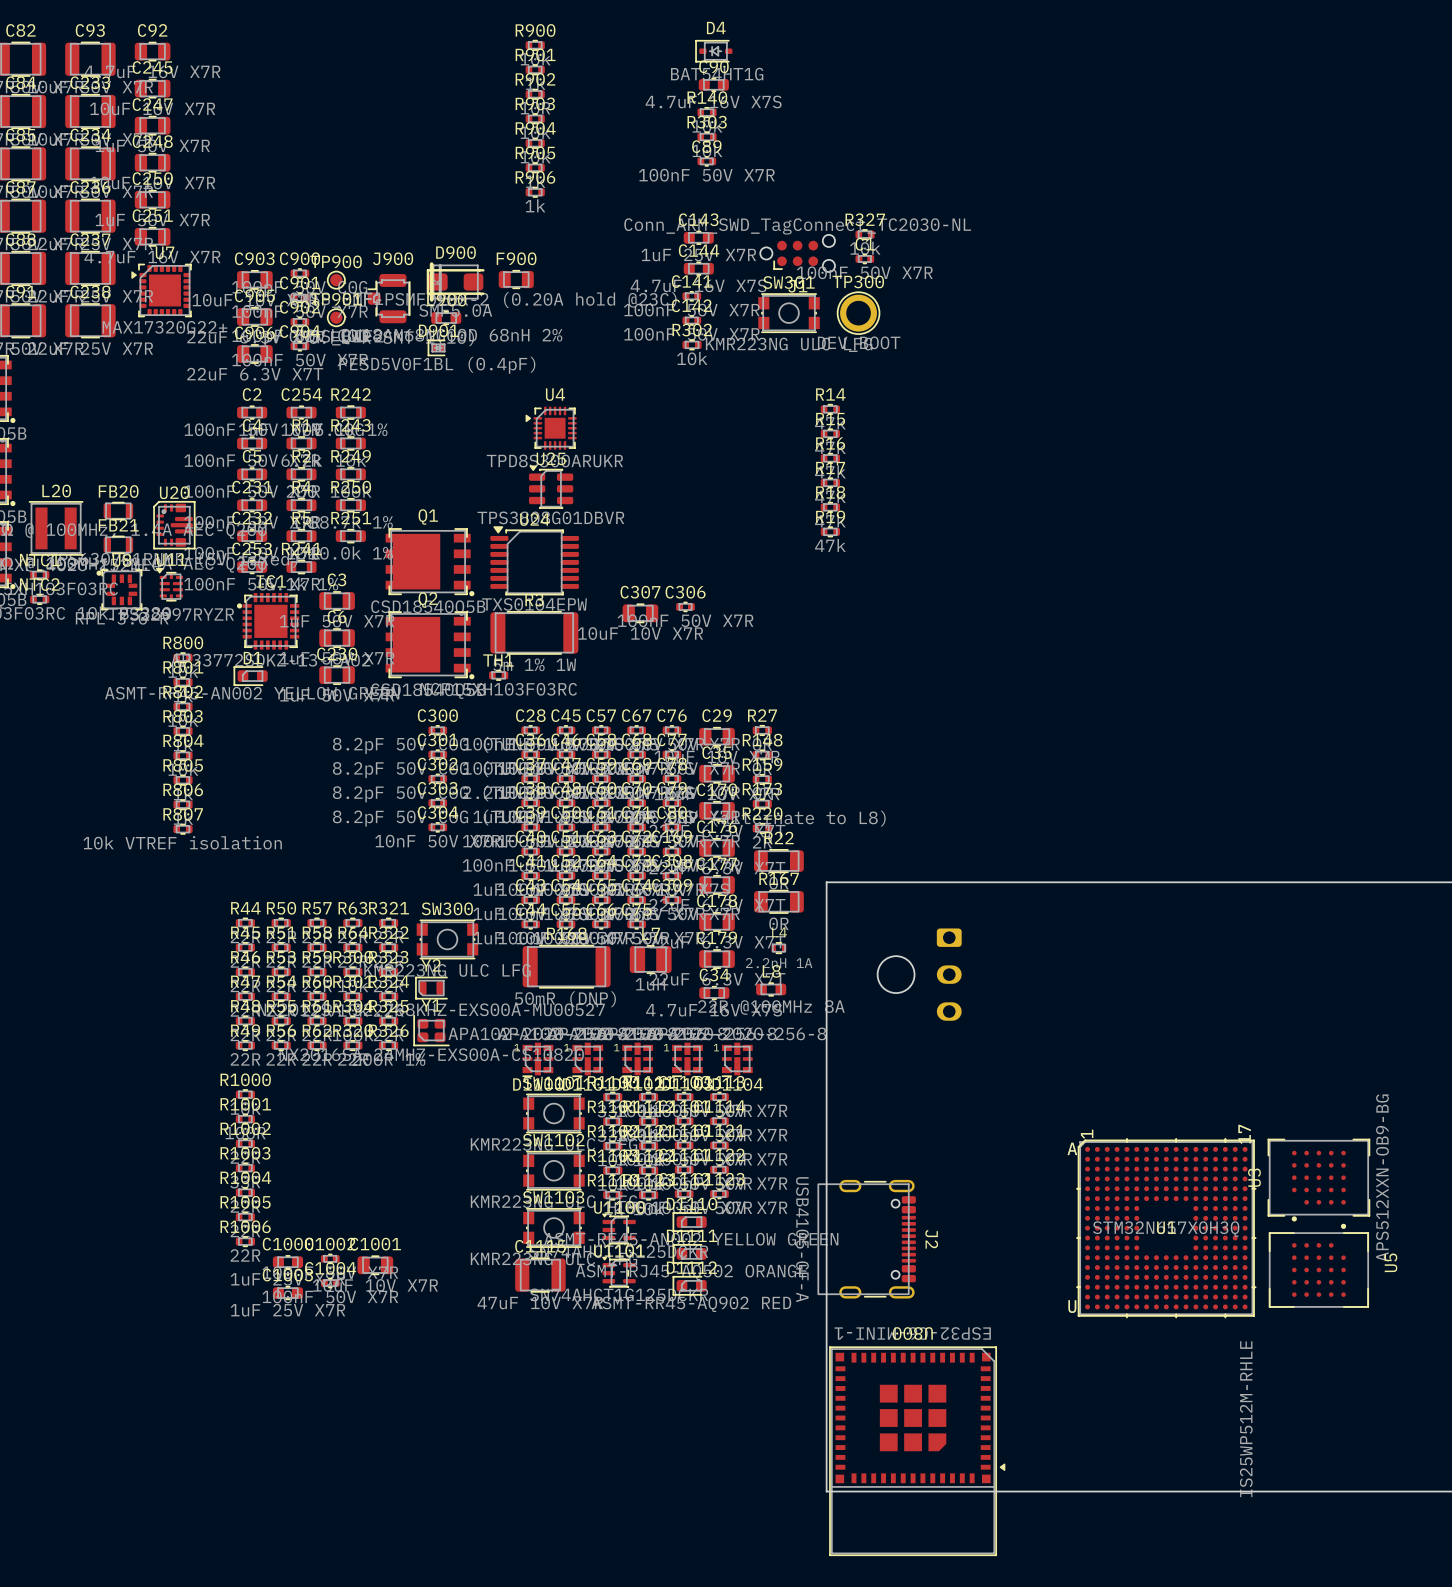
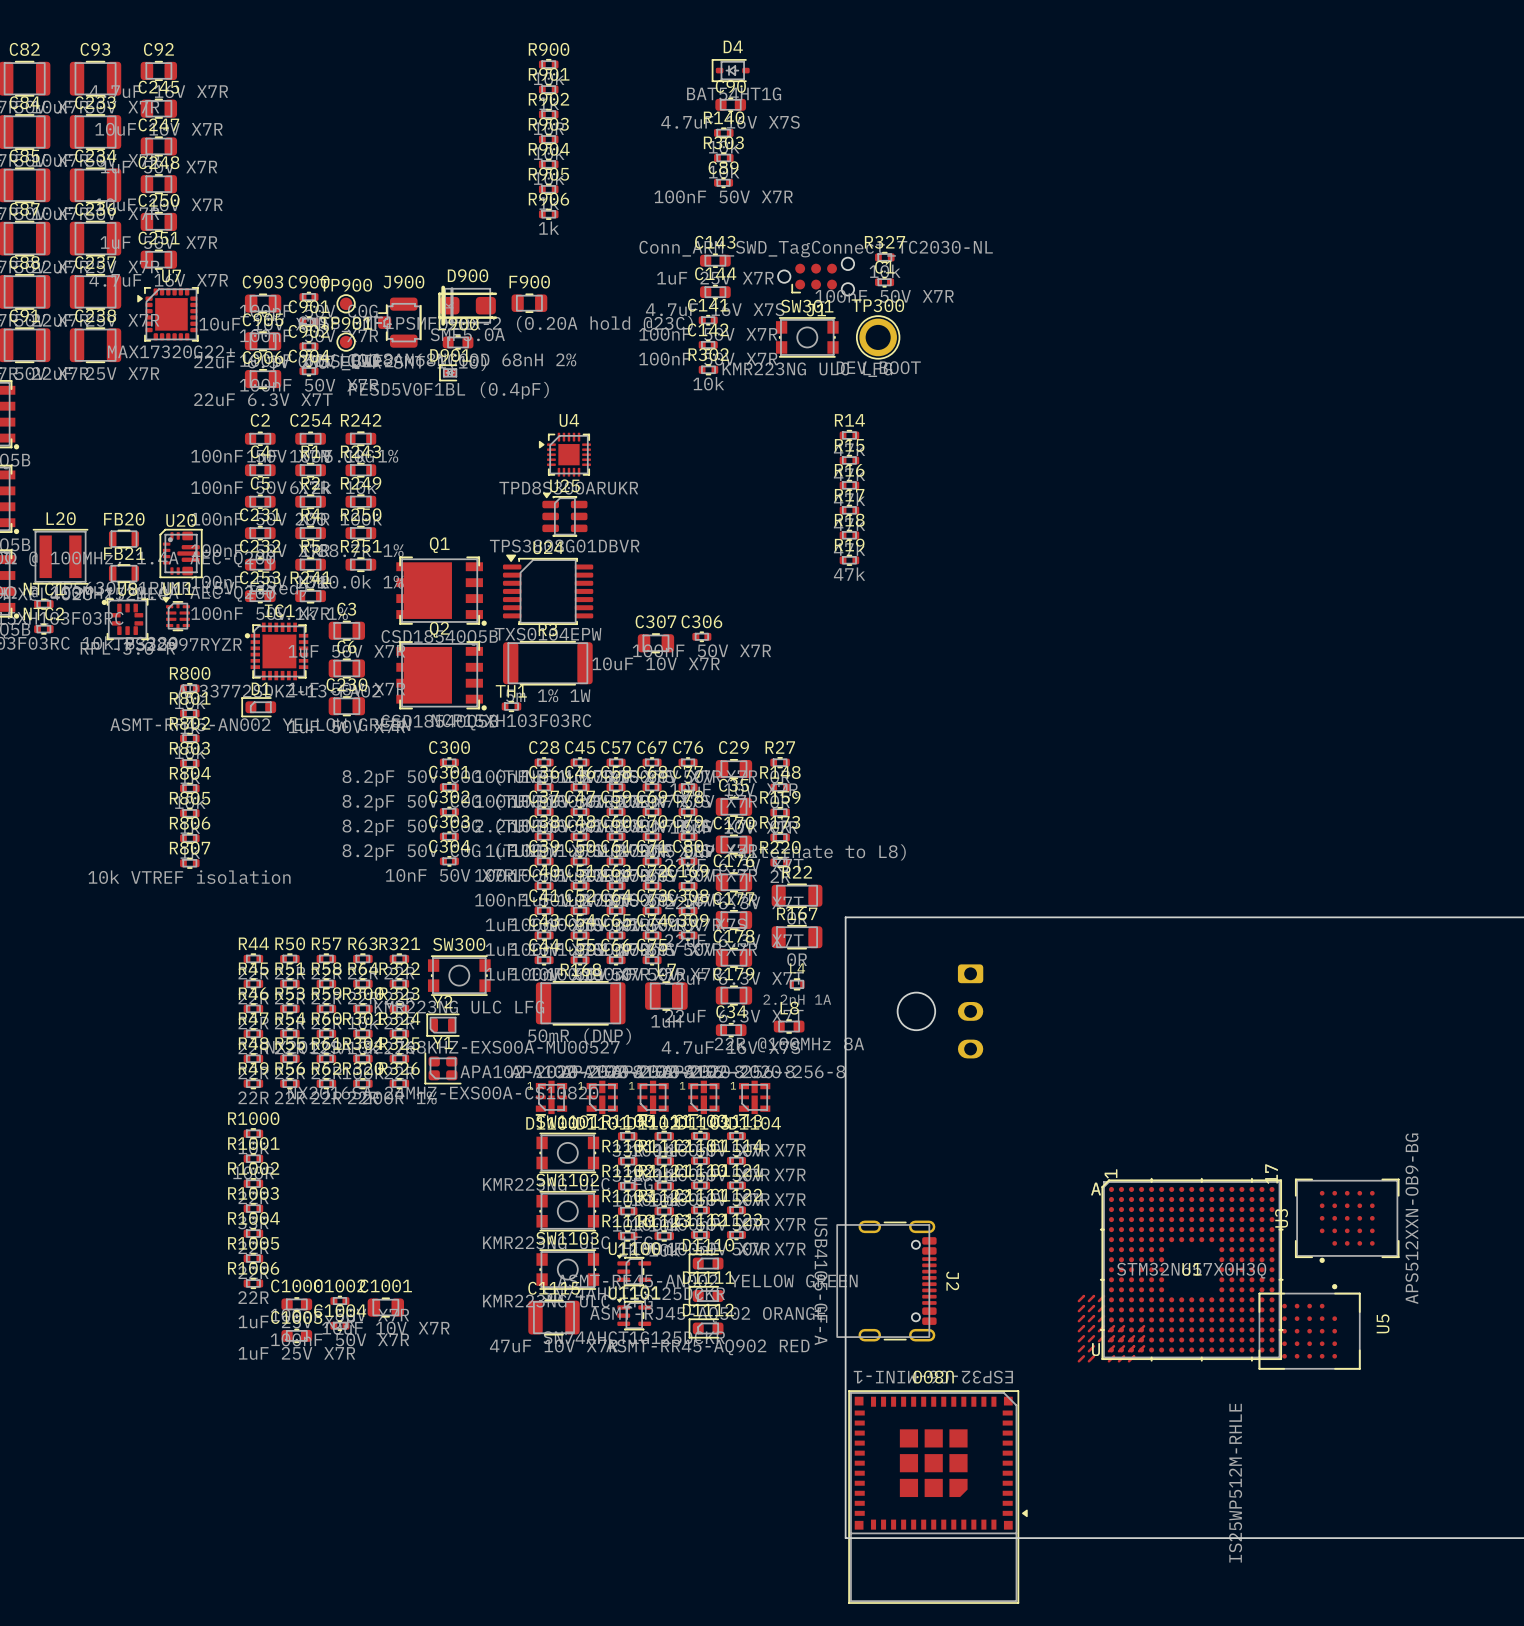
track: none -> (1083, 1296) (1078, 1301)
track: none -> (1093, 1296) (1088, 1301)
track: none -> (1103, 1296) (1098, 1301)
track: none -> (1083, 1306) (1078, 1311)
track: none -> (1093, 1306) (1088, 1311)
track: none -> (1103, 1306) (1098, 1311)
U5 position: (1318, 1265) -> (1309, 1326)
track: none -> (1083, 1316) (1078, 1321)
track: none -> (1093, 1316) (1088, 1321)
track: none -> (1103, 1316) (1098, 1321)
track: none -> (1083, 1326) (1078, 1331)
track: none -> (1093, 1326) (1088, 1331)
track: none -> (1103, 1326) (1098, 1331)
track: none -> (1113, 1326) (1108, 1331)
track: none -> (1124, 1326) (1119, 1331)
track: none -> (1144, 1326) (1139, 1331)
track: none -> (1083, 1336) (1078, 1341)
track: none -> (1093, 1336) (1088, 1341)
track: none -> (1103, 1336) (1098, 1341)
track: none -> (1113, 1336) (1108, 1341)
track: none -> (1124, 1336) (1119, 1341)
track: none -> (1134, 1336) (1129, 1341)
track: none -> (1144, 1336) (1139, 1341)
track: none -> (1083, 1346) (1078, 1351)
track: none -> (1093, 1346) (1088, 1351)
track: none -> (1113, 1346) (1108, 1351)
track: none -> (1124, 1346) (1119, 1351)
track: none -> (1134, 1346) (1129, 1351)
track: none -> (1144, 1346) (1139, 1351)
track: none -> (1083, 1356) (1078, 1361)
track: none -> (1093, 1356) (1088, 1361)
track: none -> (1113, 1356) (1108, 1361)
track: none -> (1124, 1356) (1119, 1361)
track: none -> (1134, 1356) (1129, 1361)

